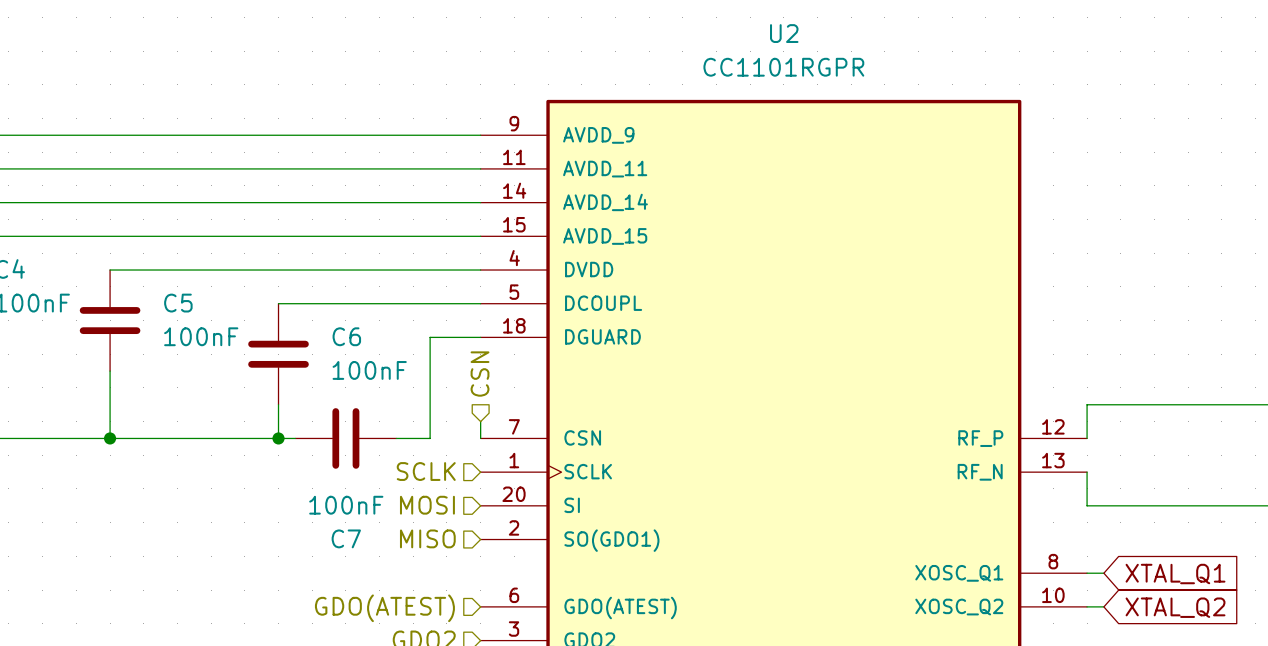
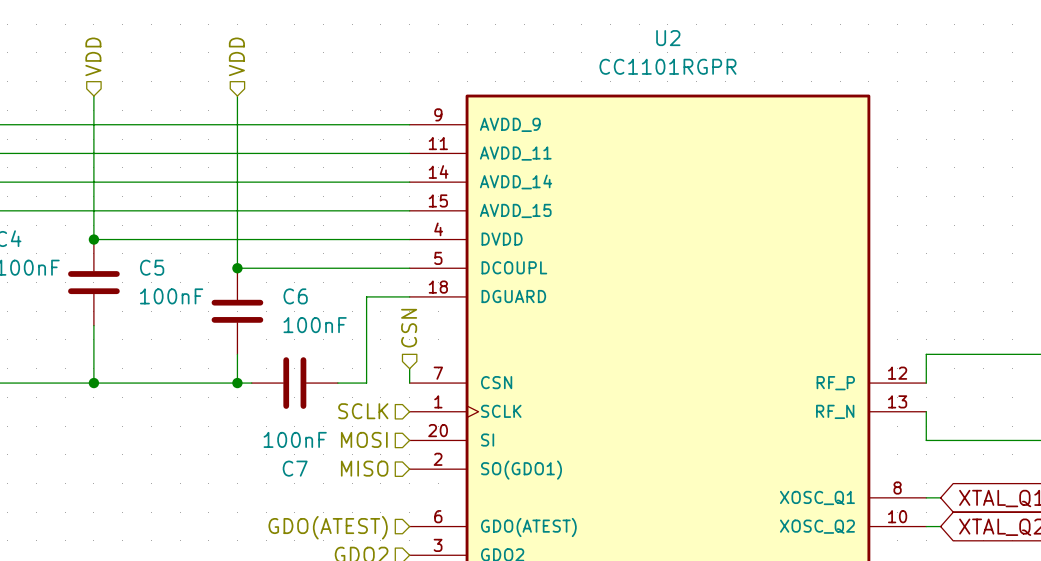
hierarchical label: none -> VDD (93, 56)
hierarchical label: none -> VDD (236, 56)
wire: none -> (93, 96) (93, 239)
wire: none -> (237, 96) (237, 268)
junction: none -> (93, 239)
junction: none -> (237, 268)

